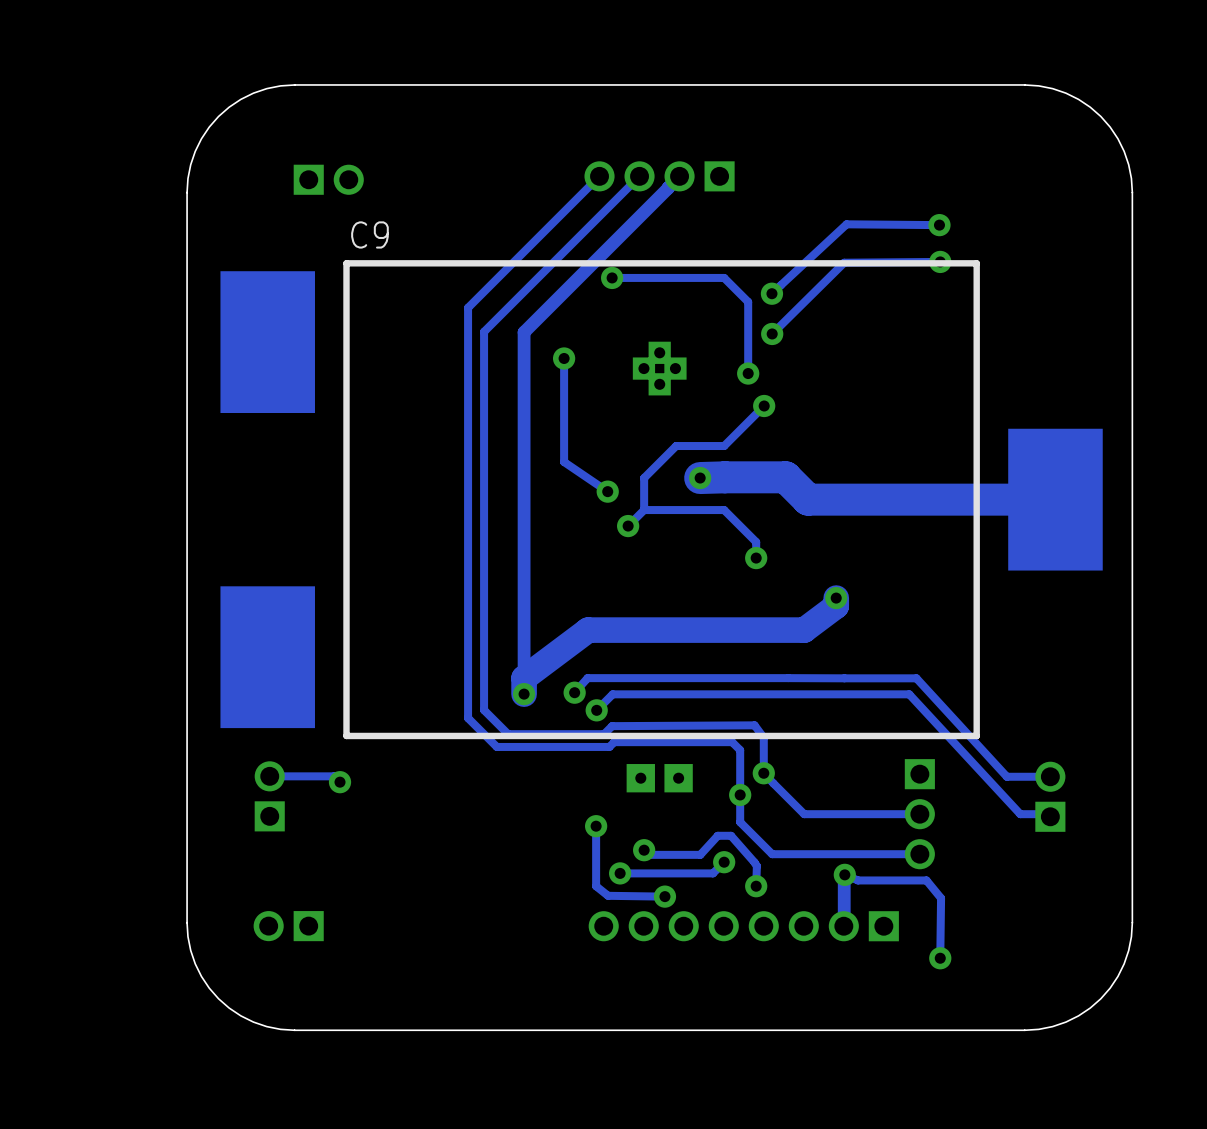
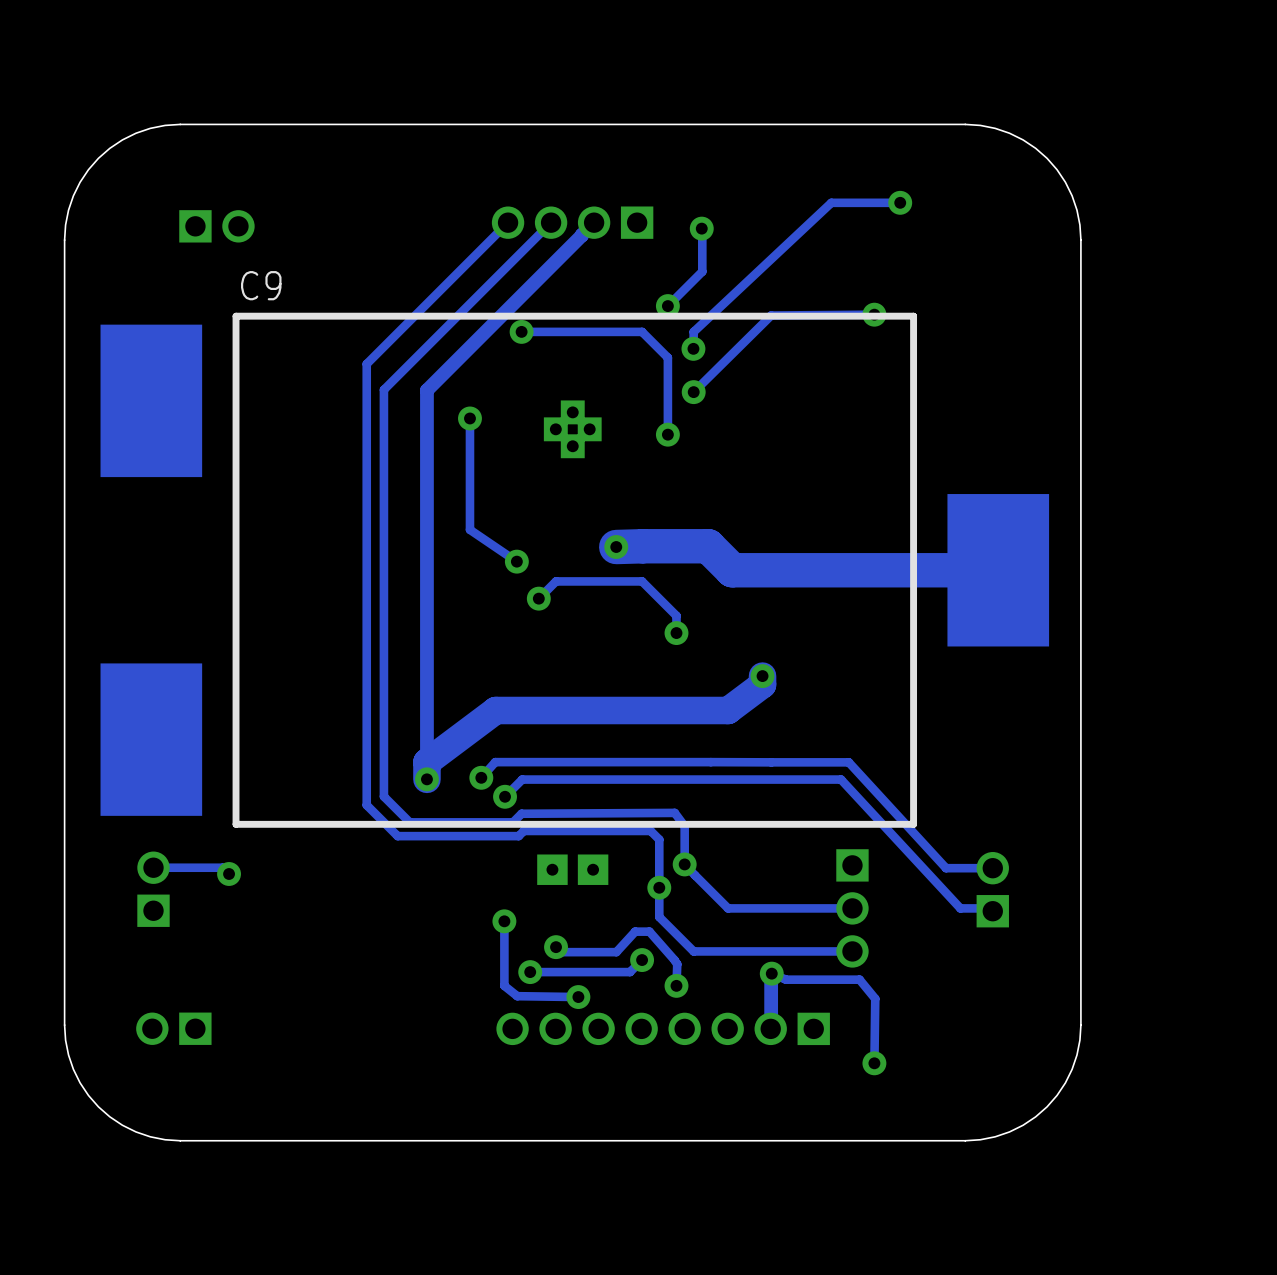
via: none -> (701, 228)
track: none -> (702, 228) (702, 271) (667, 306)
track: (939, 225) (846, 224) (771, 293) -> (900, 202) (831, 202) (693, 331) (693, 348)
via position: (939, 225) -> (900, 202)
via: none -> (667, 306)
track: (764, 406) (724, 446) (676, 446) (644, 478) (644, 510) -> none
via: (764, 406) -> none

